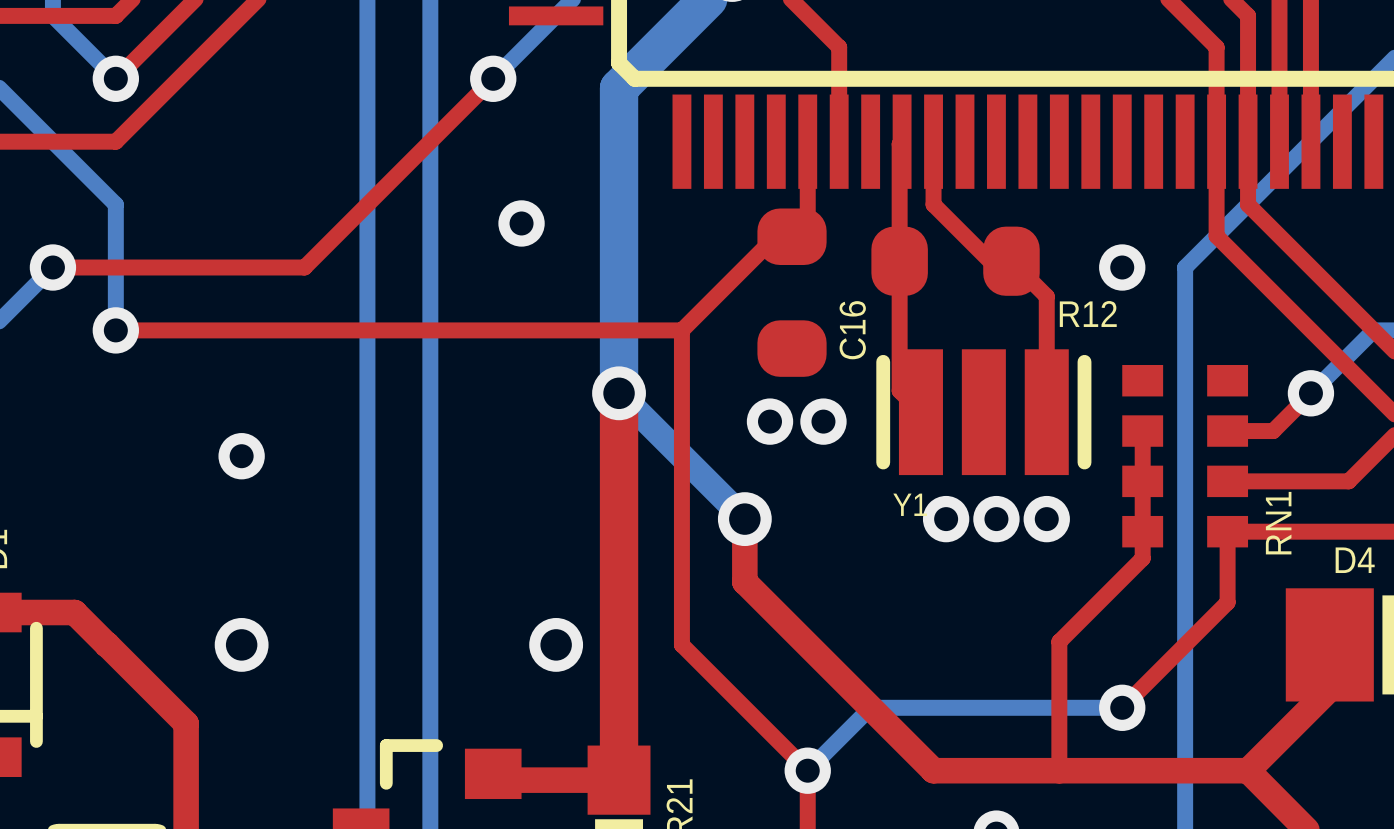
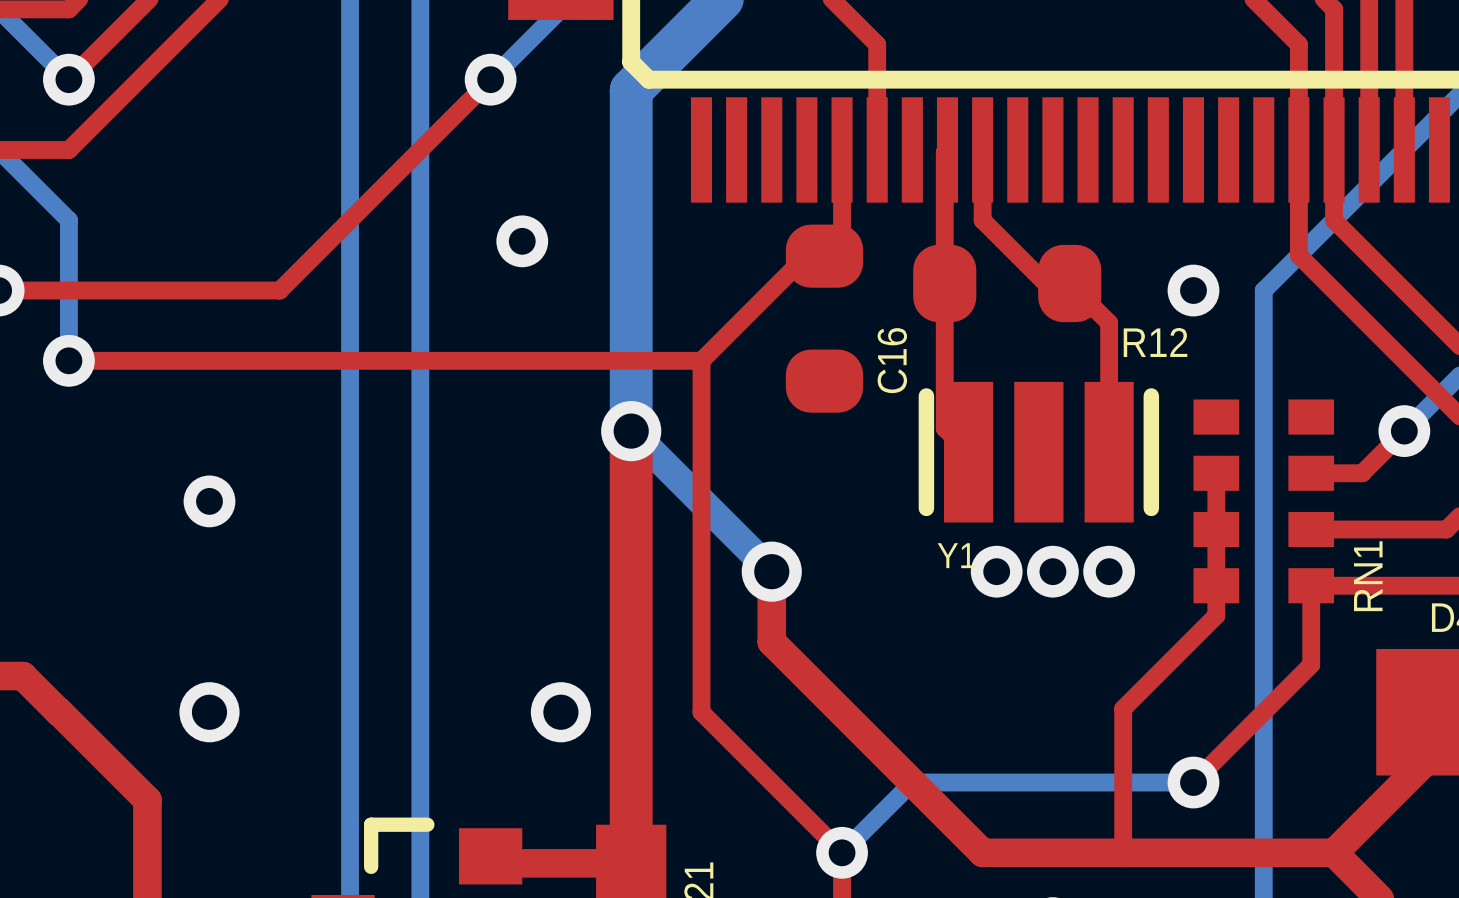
via: (770, 421) -> none
via: (823, 421) -> none

